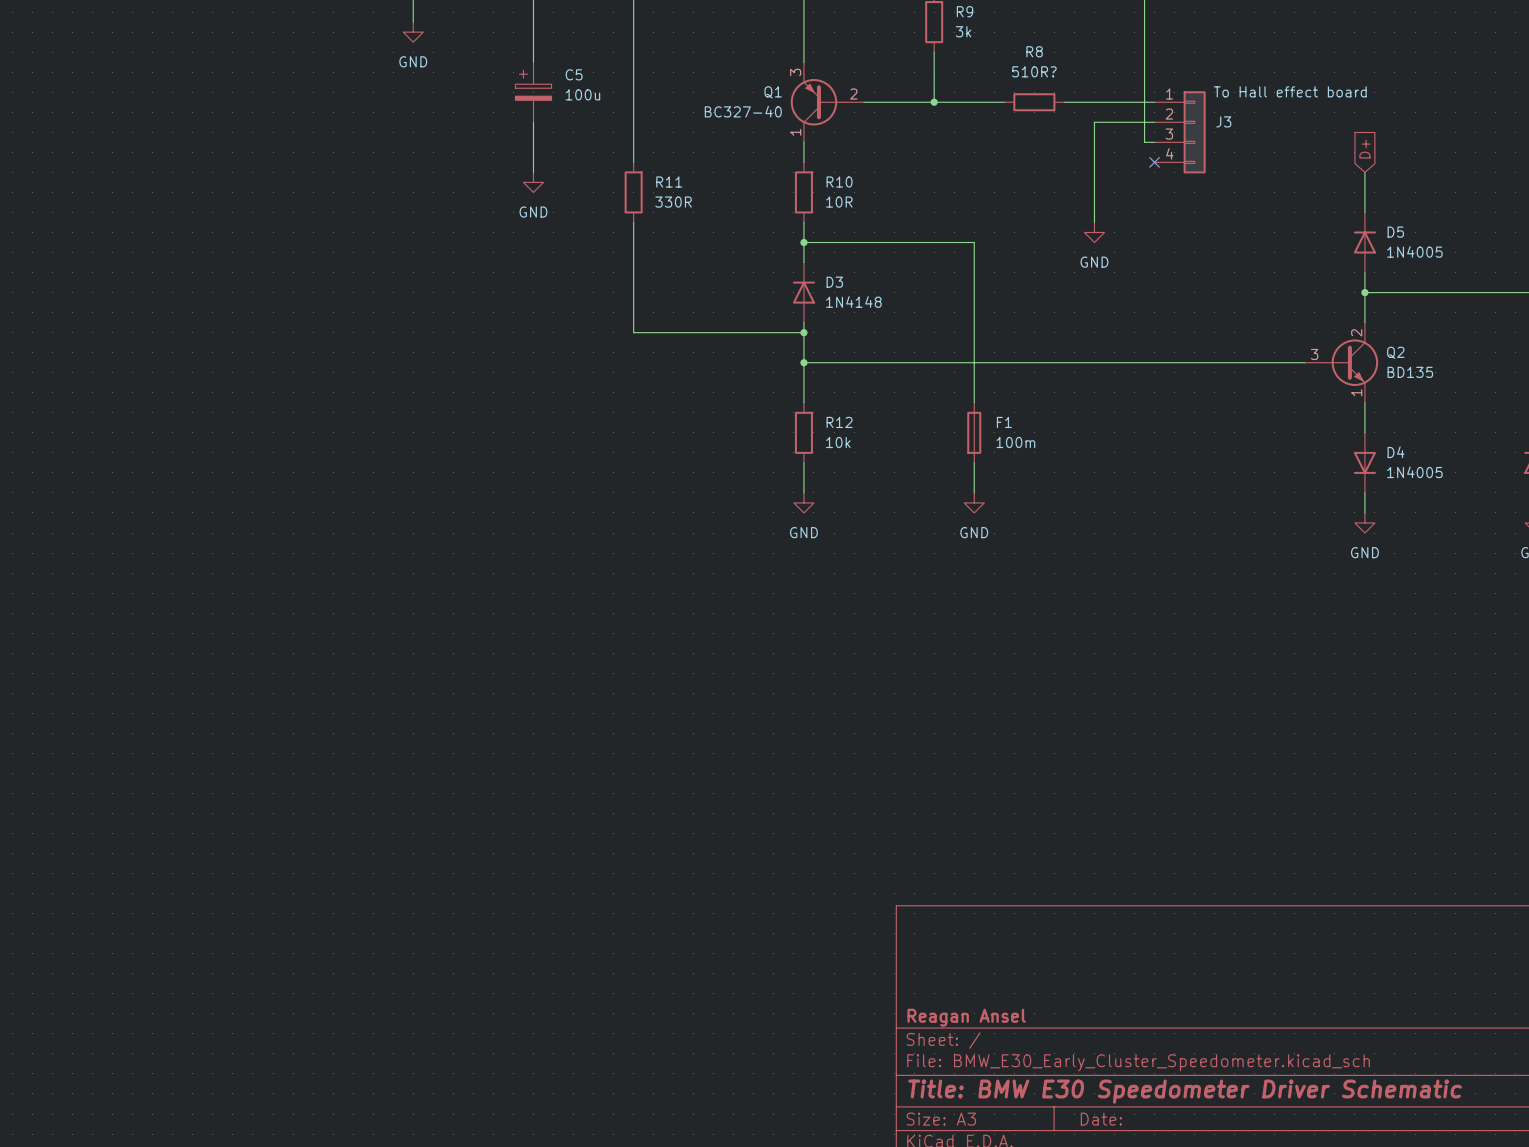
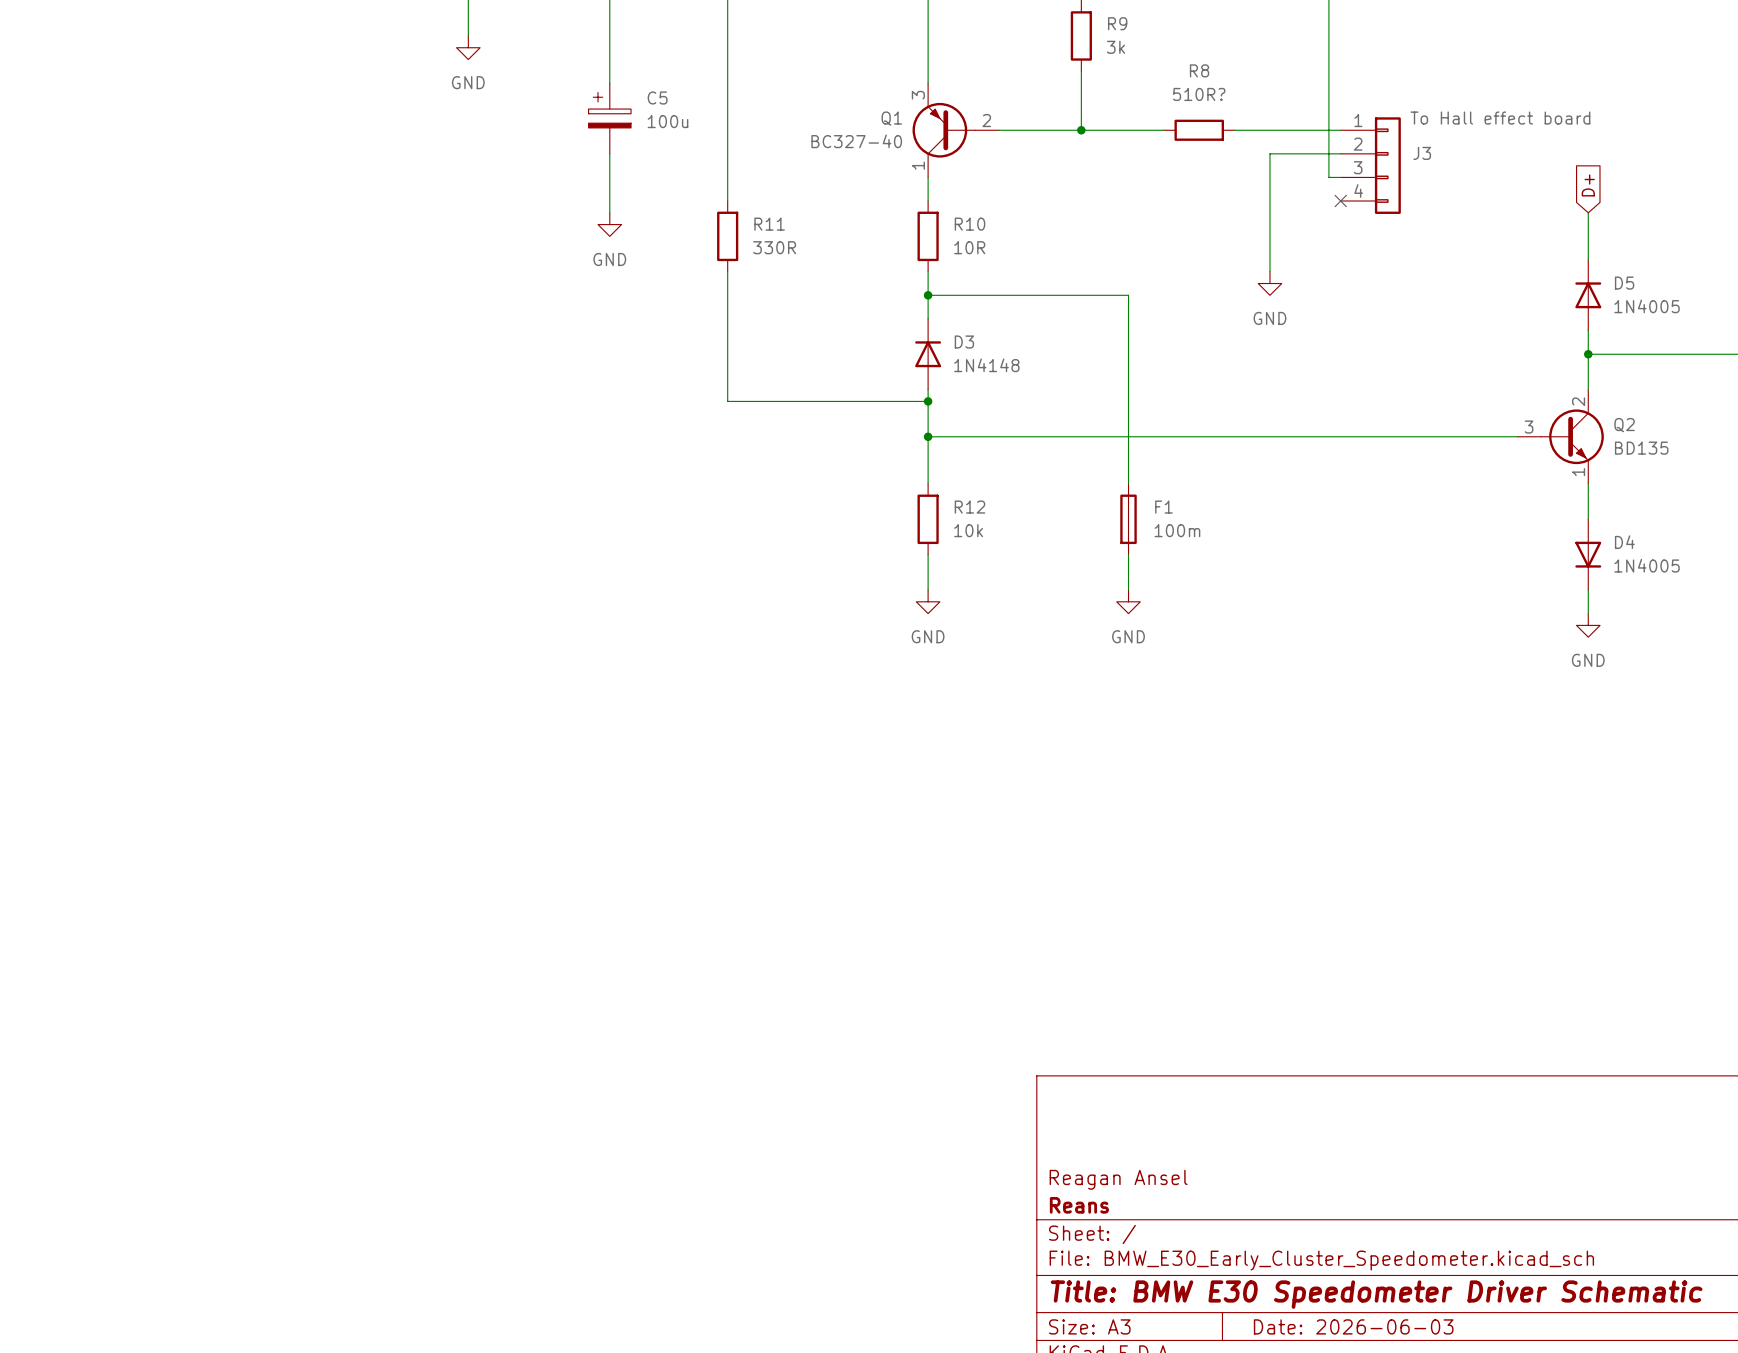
title block: none -> Reagan Ansel (1118, 1179)
title block: Reagan Ansel (966, 1017) -> Reans (1079, 1205)
title block: Date: (1101, 1119) -> Date: 2026-06-03 (1353, 1326)

